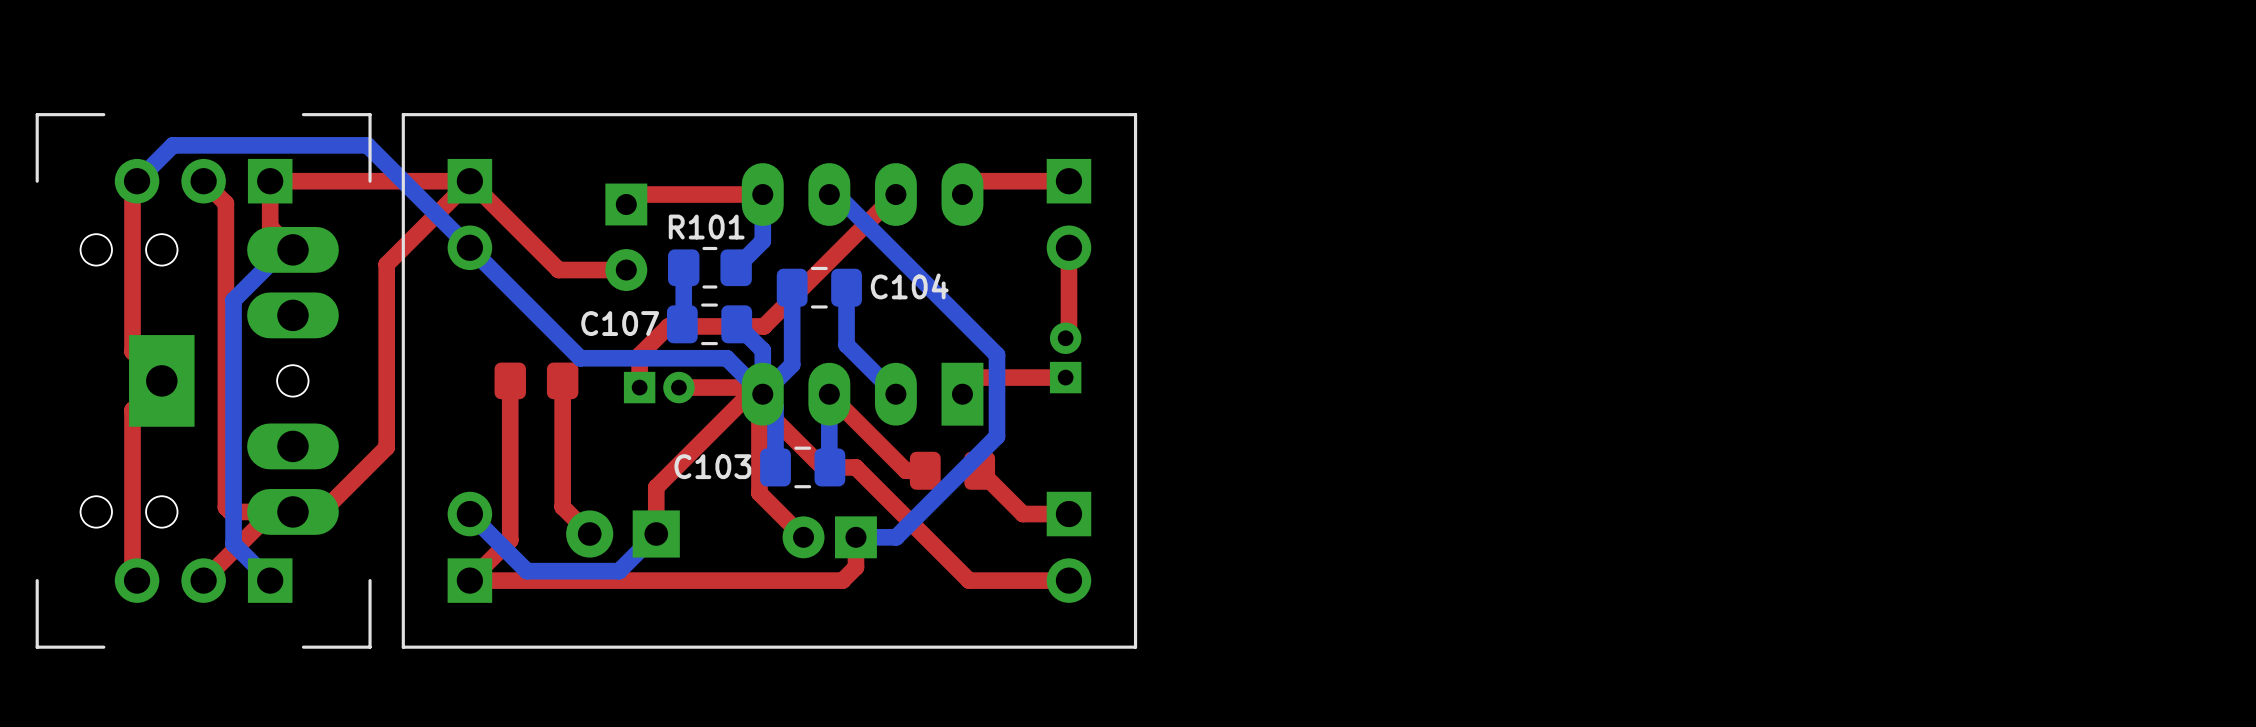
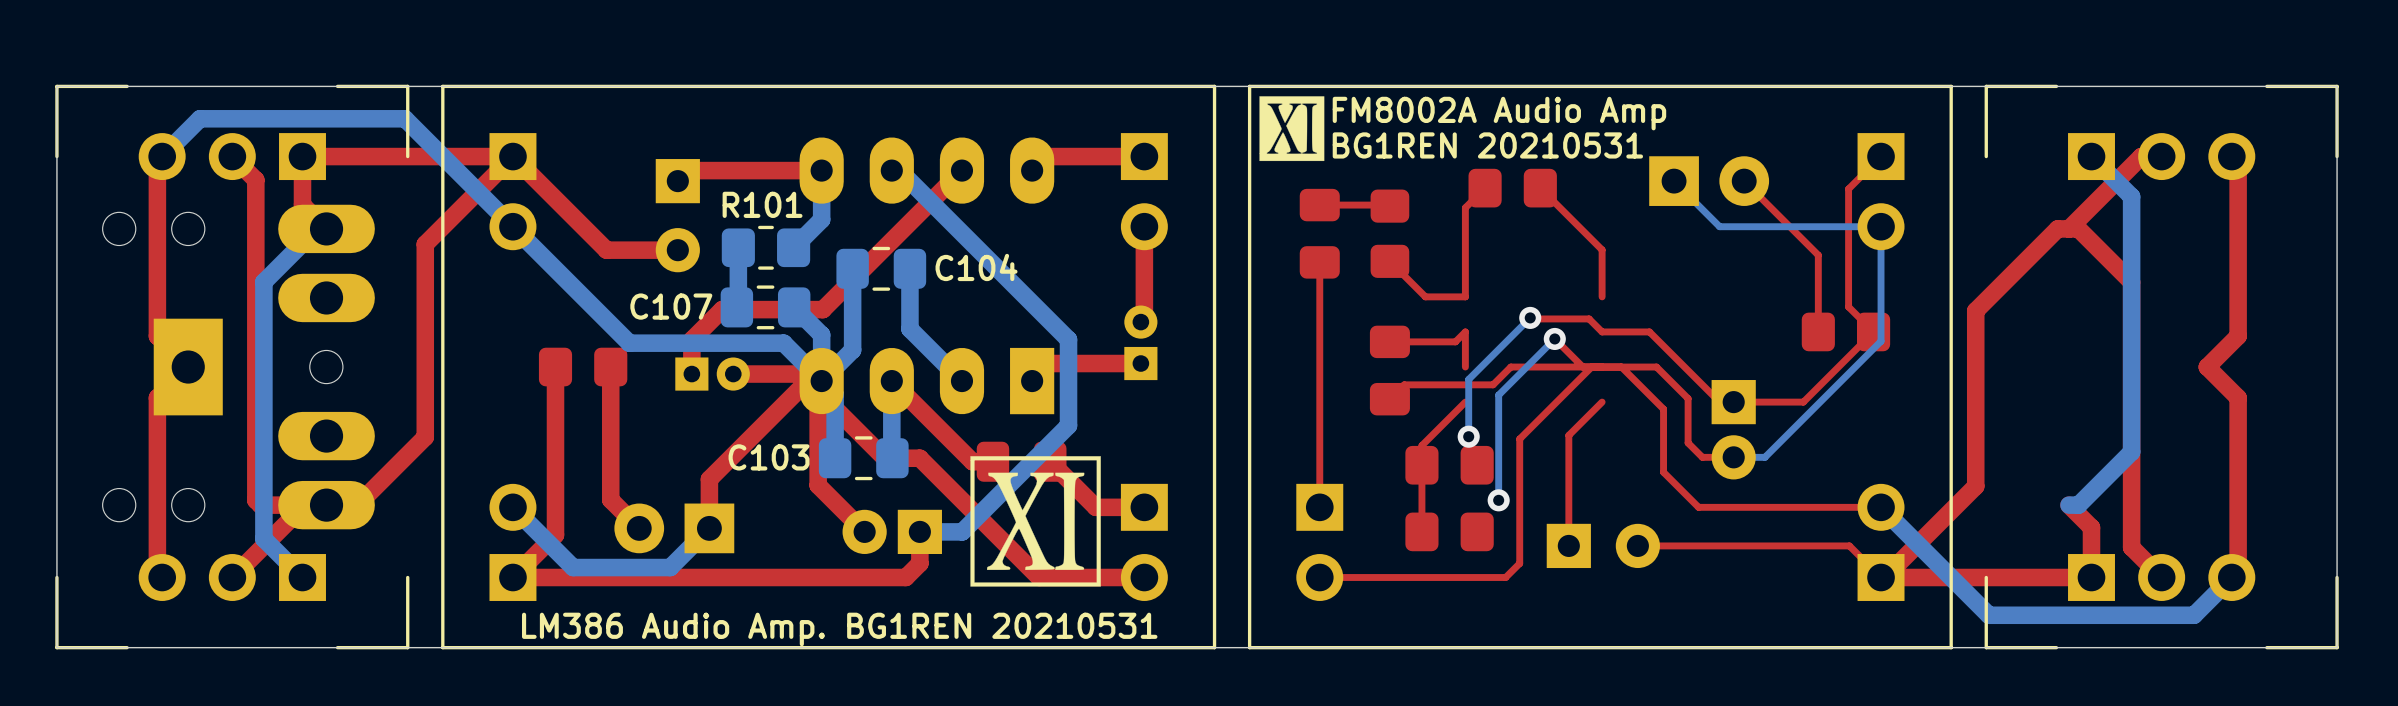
line: none -> (1951, 86) (1249, 86) (1249, 647) (1951, 647) (1951, 86)
line: none -> (2056, 86) (1986, 86) (1986, 156)
line: none -> (2266, 86) (2337, 86) (2337, 156)
board edge: none -> (2337, 86) (56, 86) (56, 647) (2337, 647) (2337, 86)
drawing: none -> [1259, 96, 1325, 162]
text: none -> FM8002A Audio Amp (1499, 113)
text: none -> BG1REN 20210531 (1487, 145)
top track: none -> (1881, 156) (1848, 189) (1848, 306) (1873, 331) (1803, 402) (1719, 402) (1649, 331) (1602, 331) (1589, 318) (1530, 317)
bottom track: none -> (2091, 156) (2131, 196) (2131, 452) (2078, 505) (2068, 505)
top track: none -> (2161, 156) (2141, 156) (2068, 228)
part: none -> (2161, 156)
top track: none -> (2231, 156) (2238, 162) (2238, 336) (2207, 367) (2238, 397) (2238, 571) (2231, 577)
bottom track: none -> (1674, 181) (1719, 226) (1881, 226) (1881, 341) (1764, 457) (1733, 457)
part: none -> (1709, 181)
top track: none -> (1744, 181) (1818, 255) (1818, 331)
top track: none -> (1485, 188) (1465, 207) (1465, 296) (1425, 296) (1389, 261)
part: none -> (1512, 188)
top track: none -> (1540, 188) (1602, 249) (1602, 296)
part: none -> (1881, 191)
top track: none -> (1319, 205) (1389, 206)
part: none -> (1319, 233)
part: none -> (1389, 233)
top track: none -> (1319, 262) (1319, 507)
bottom track: none -> (1530, 317) (1468, 379) (1468, 436)
via: none -> (1530, 317)
part: none -> (1845, 331)
bottom track: none -> (1554, 338) (1498, 395) (1498, 500)
top track: none -> (1554, 338) (1582, 367)
via: none -> (1554, 338)
top track: none -> (1389, 341) (1455, 341) (1465, 331) (1465, 367)
top track: none -> (1591, 367) (1519, 439) (1519, 563) (1505, 577) (1319, 577)
top track: none -> (1621, 367) (1663, 409) (1663, 472) (1698, 507) (1881, 507)
part: none -> (1389, 370)
top track: none -> (1389, 399) (1404, 384) (1493, 384) (1510, 367) (1656, 367) (1688, 398) (1688, 443) (1702, 457) (1733, 457)
top track: none -> (1465, 402) (1421, 445) (1421, 531)
top track: none -> (1602, 402) (1568, 435) (1568, 545)
part: none -> (1733, 429)
via: none -> (1468, 436)
drawing: none -> [970, 456, 1101, 587]
part: none -> (1449, 465)
via: none -> (1498, 500)
top track: none -> (2068, 505) (2091, 527) (2091, 577) (1881, 577) (1849, 545) (1637, 545)
bottom track: none -> (1881, 507) (1988, 615) (2194, 615) (2231, 577)
part: none -> (1449, 531)
part: none -> (1319, 542)
part: none -> (1881, 542)
part: none -> (1603, 545)
line: none -> (1986, 577) (1986, 647) (2056, 647)
top track: none -> (2161, 577) (2131, 547) (2131, 282) (2078, 228) (2057, 228) (1975, 310) (1975, 486) (1884, 577)
part: none -> (2161, 577)
line: none -> (2337, 577) (2337, 647) (2266, 647)
text: none -> LM386 Audio Amp. BG1REN 20210531 (839, 629)

